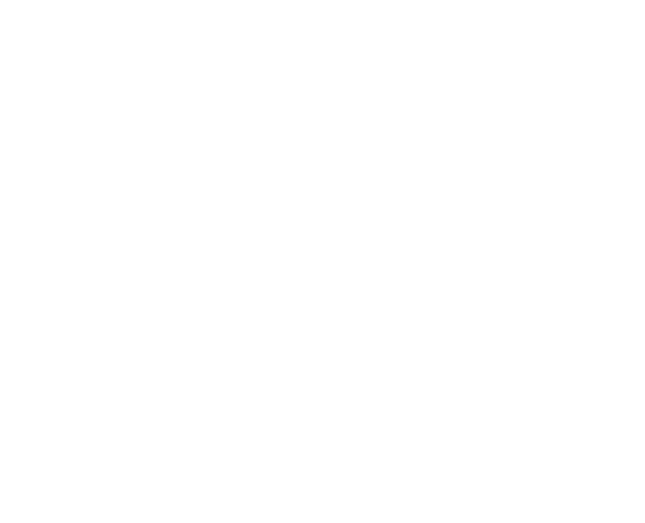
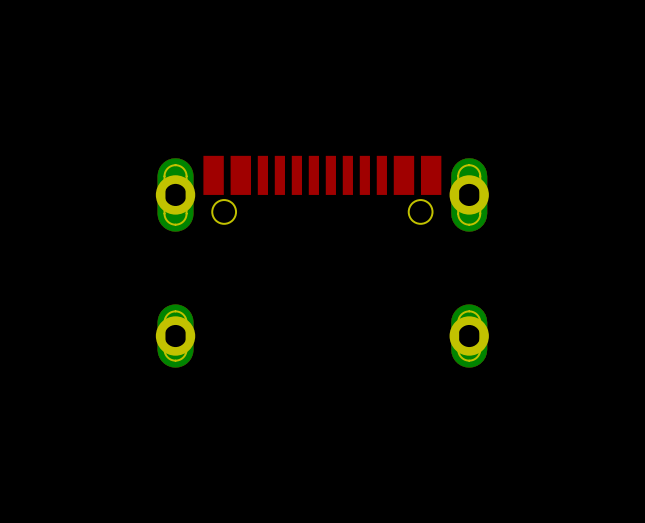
part: none -> (322, 261)

